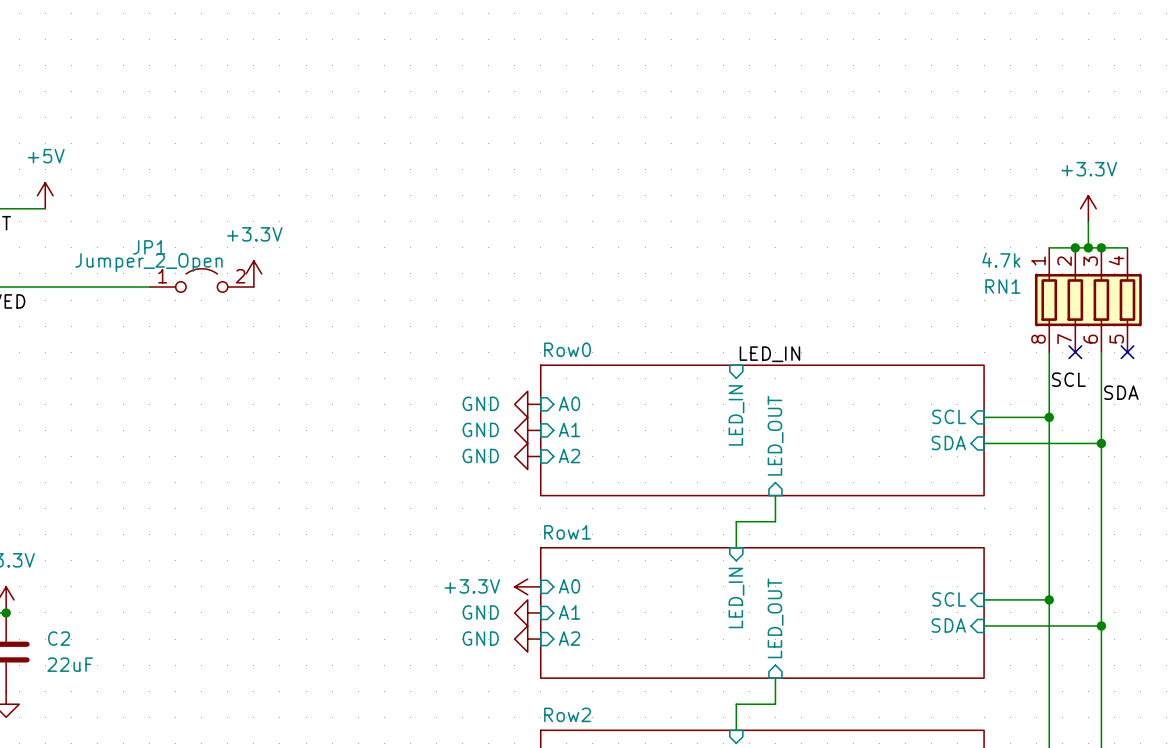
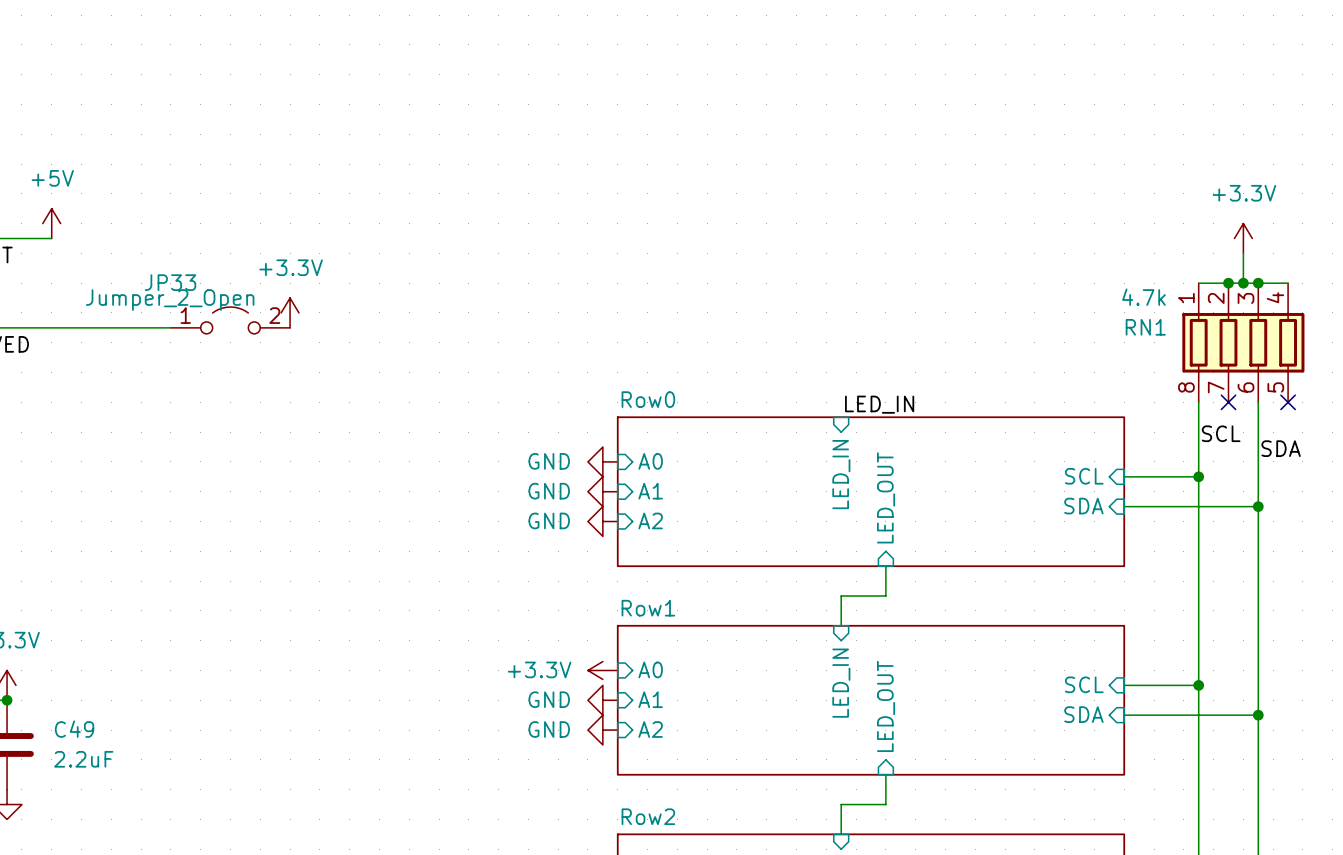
JP1 name: JP1 (149, 247) -> JP33 (170, 282)
C2 name: C2 (59, 638) -> C49 (74, 729)
C2 value: 22uF (70, 664) -> 2.2uF (83, 759)

